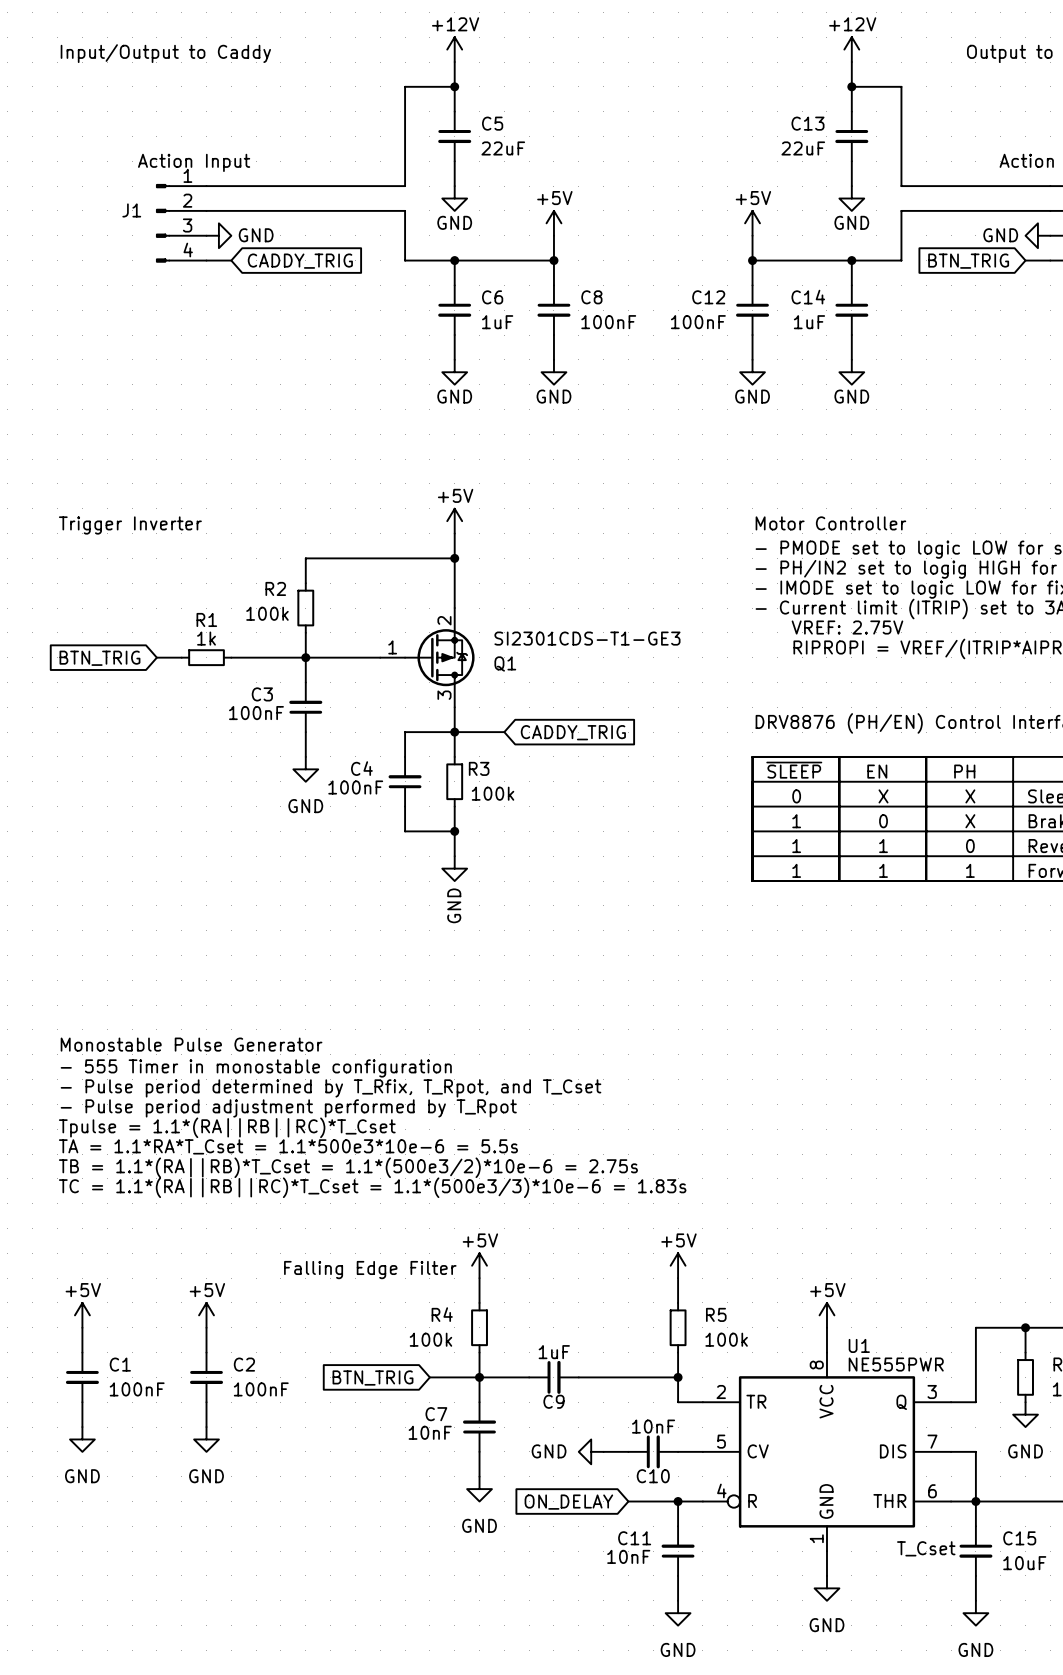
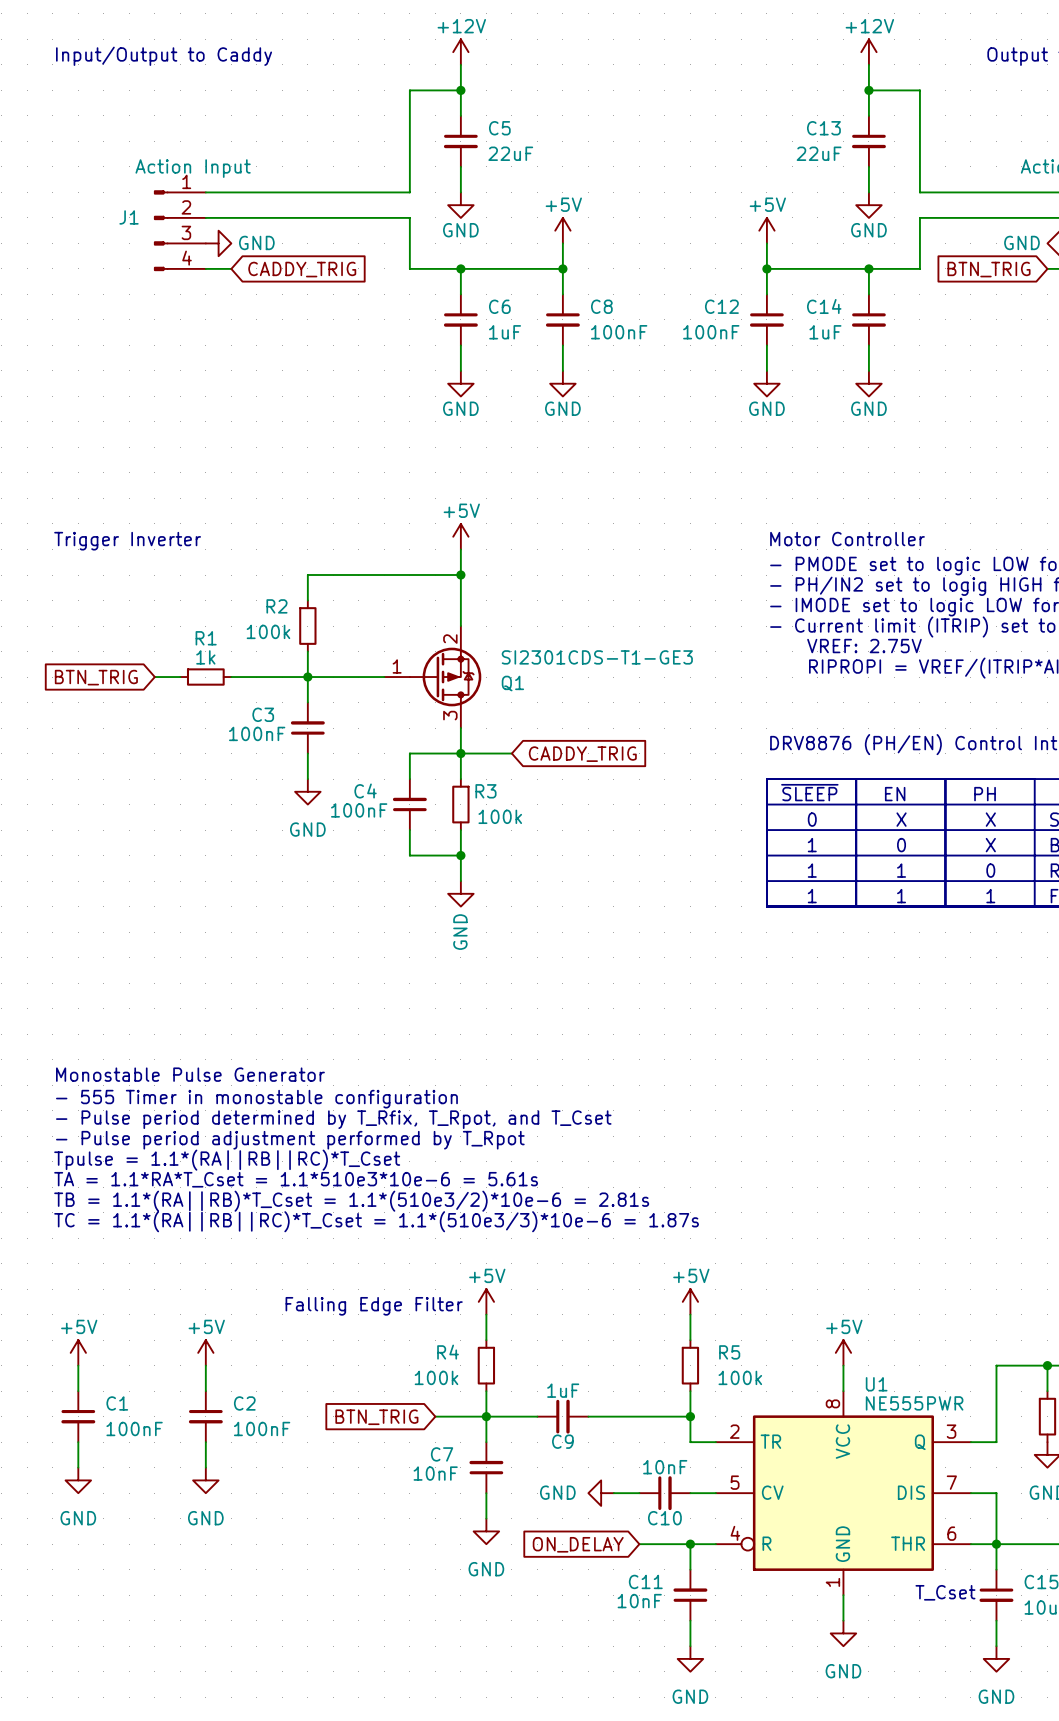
text: TA = 1.1*RA*T_Cset = 1.1*500e3*10e-6 = 5.5s (288, 1146) -> TA = 1.1*RA*T_Cset = 1.1*510e3*10e-6 = 5.61s (296, 1179)
text: TB = 1.1*(RA||RB)*T_Cset = 1.1*(500e3/2)*10e-6 = 2.75s (348, 1167) -> TB = 1.1*(RA||RB)*T_Cset = 1.1*(510e3/2)*10e-6 = 2.81s (351, 1201)
text: TC = 1.1*(RA||RB||RC)*T_Cset = 1.1*(500e3/3)*10e-6 = 1.83s (372, 1187) -> TC = 1.1*(RA||RB||RC)*T_Cset = 1.1*(510e3/3)*10e-6 = 1.87s (376, 1221)

